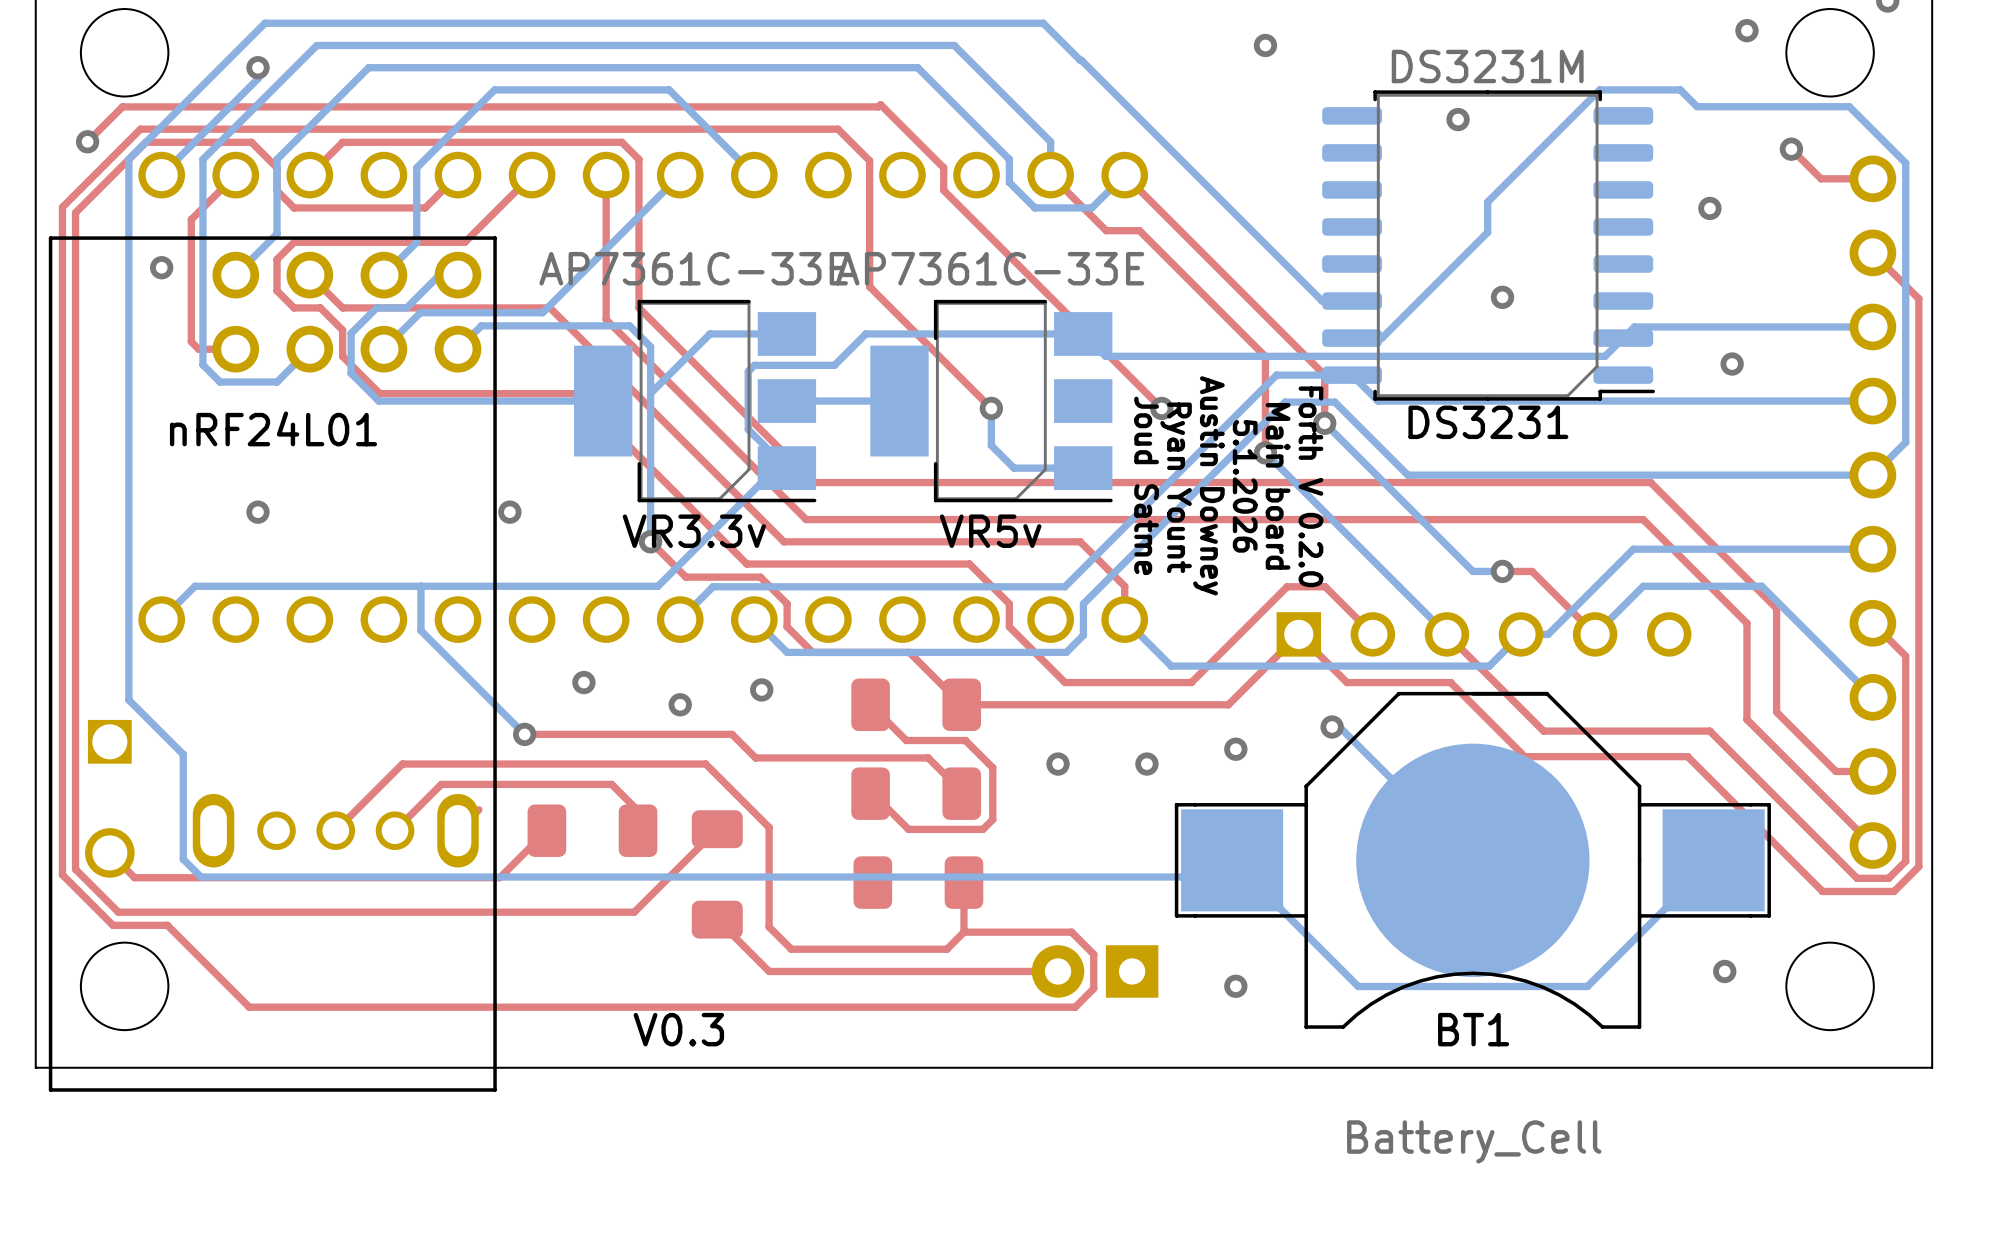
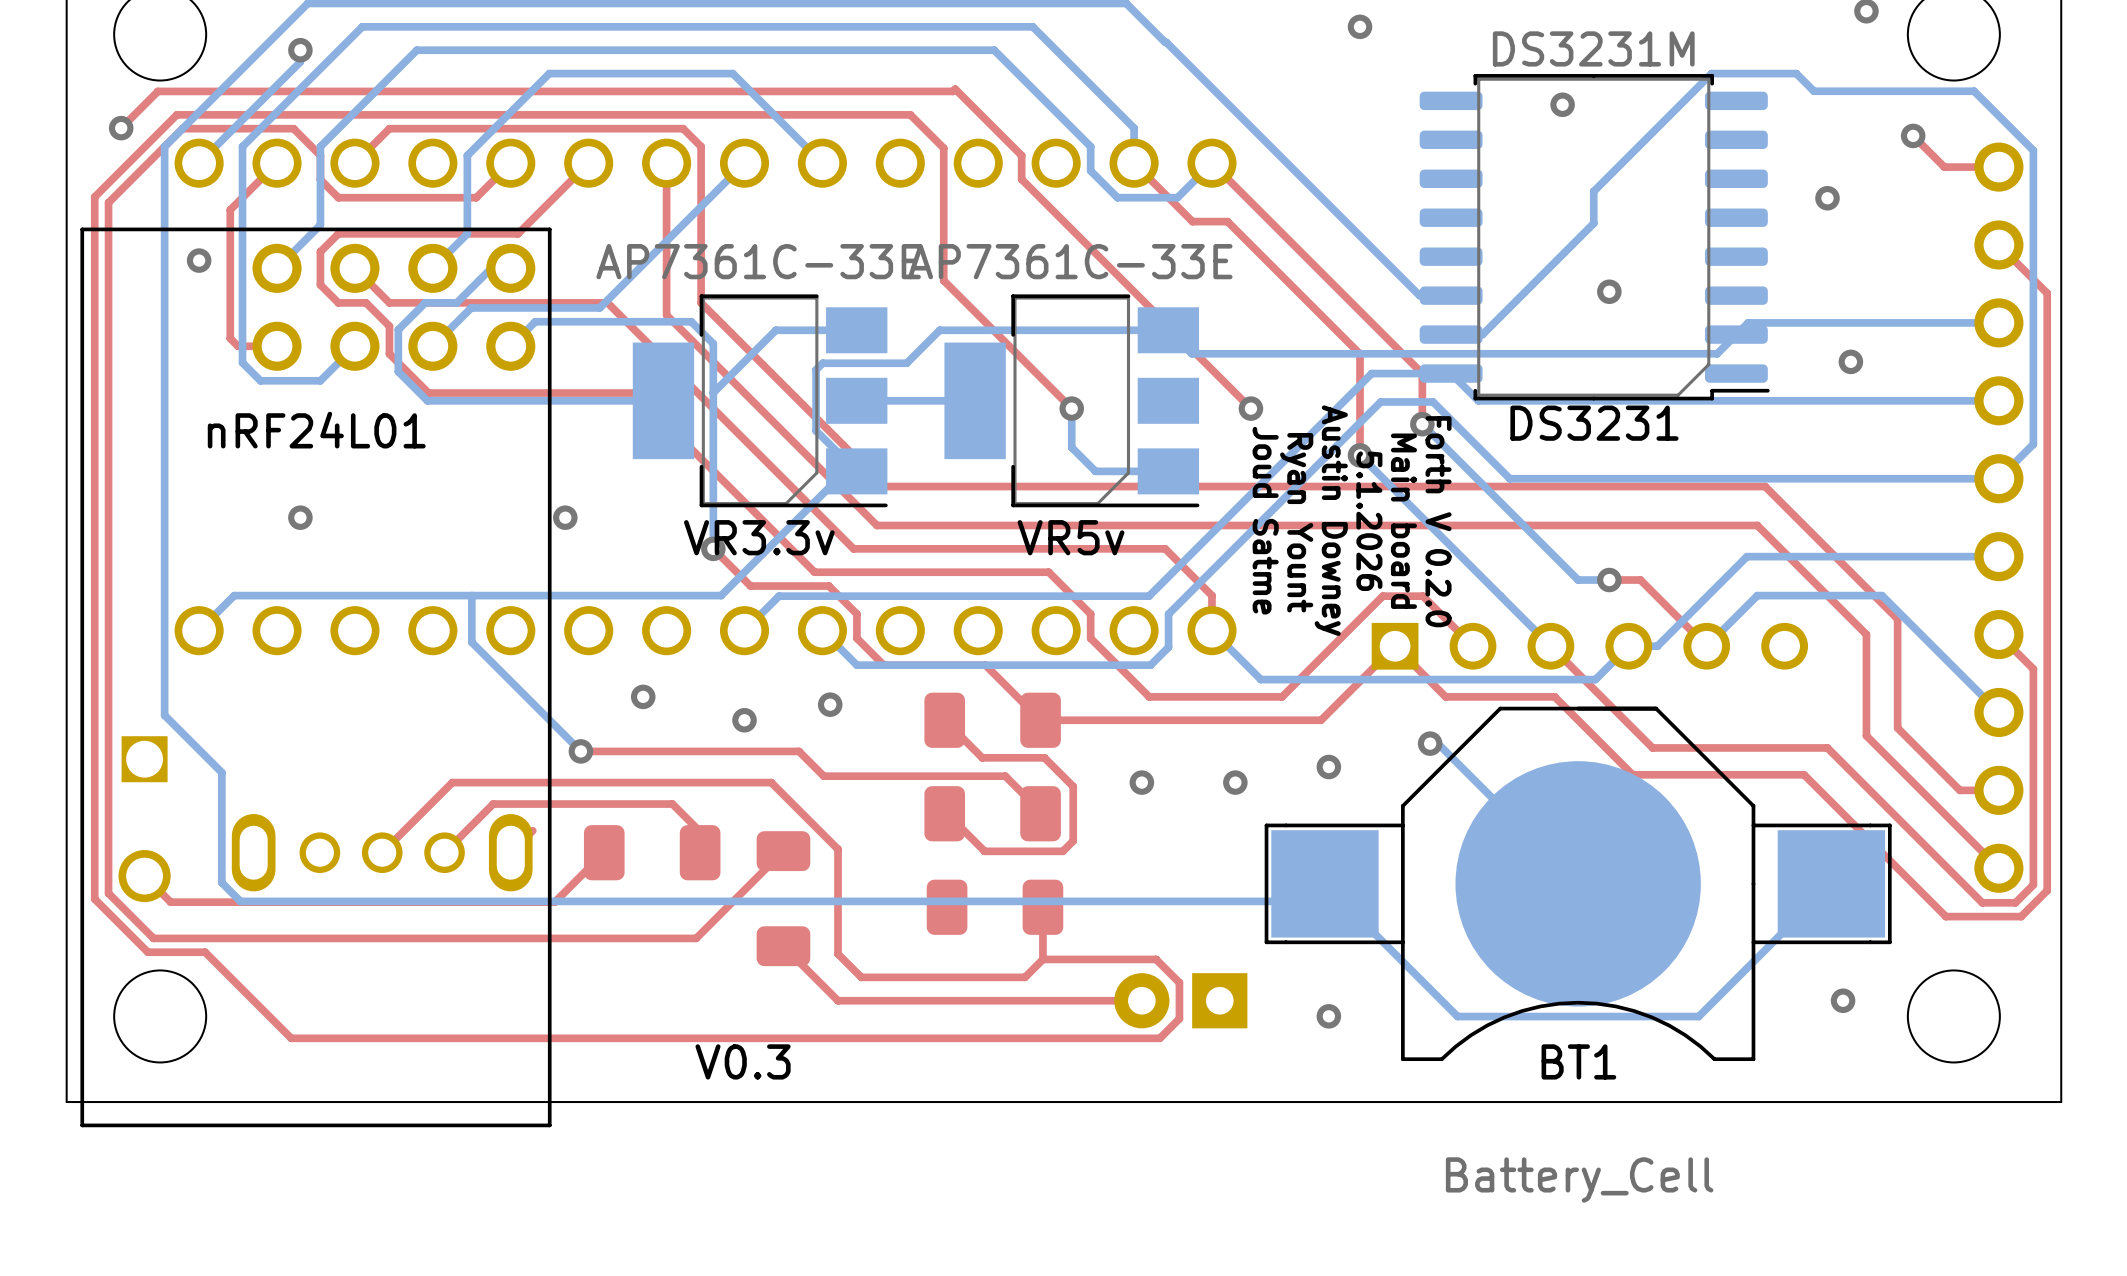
text position: Joud Satme (1146, 485) -> Joud Satme (1265, 520)
text position: Austin Downey (1208, 485) -> Austin Downey (1331, 520)
text position: 5.1.2026 (1245, 486) -> 5.1.2026 (1369, 521)
text position: Main board (1278, 486) -> Main board (1403, 521)
text position: Forth V 0.2.0 (1310, 486) -> Forth V 0.2.0 (1438, 521)
text position: Ryan Yount (1176, 487) -> Ryan Yount (1296, 522)

